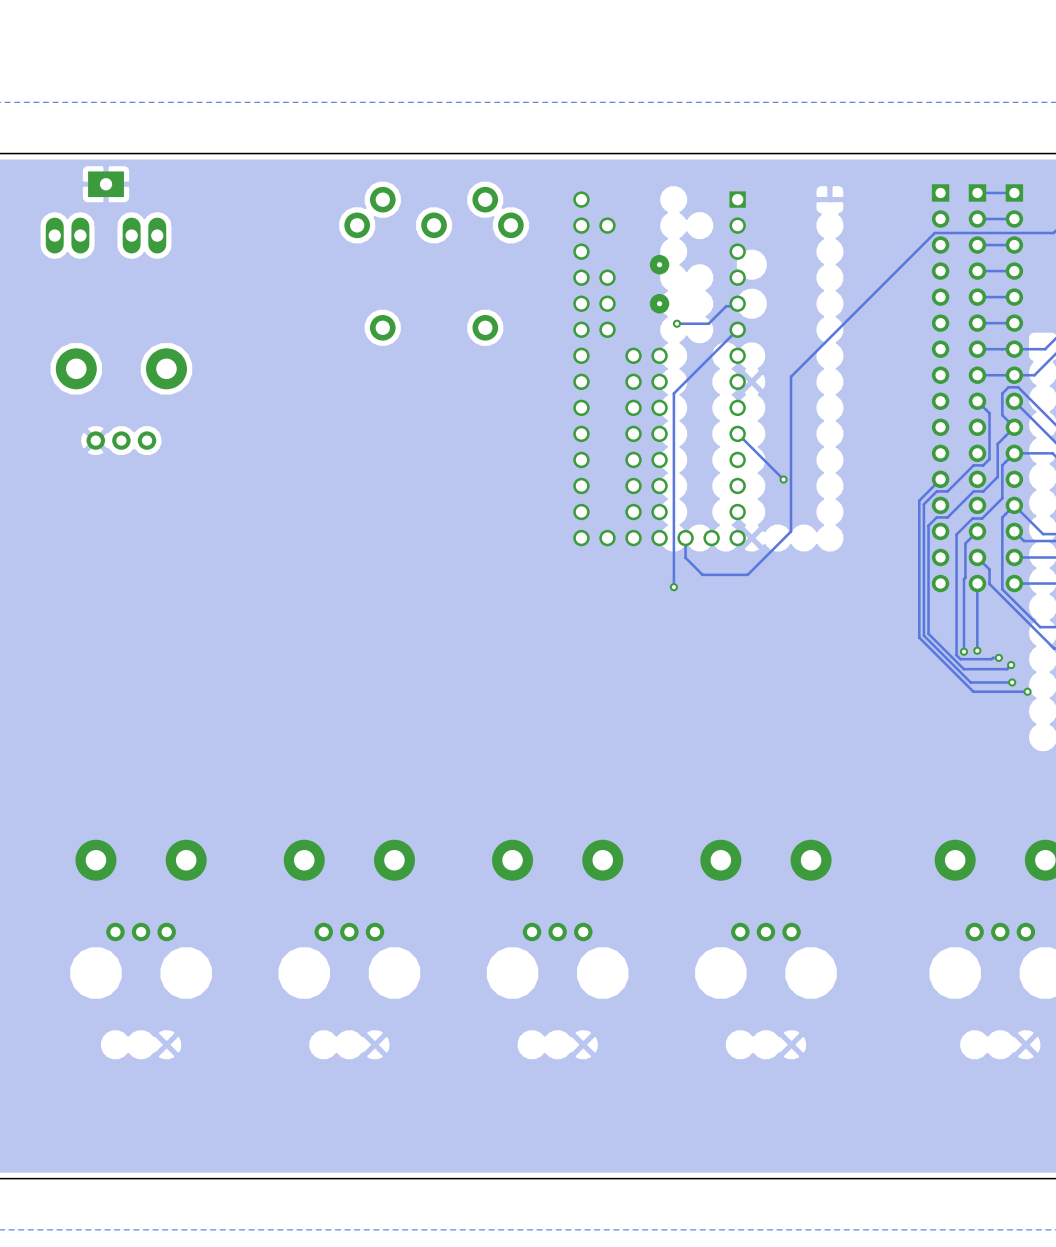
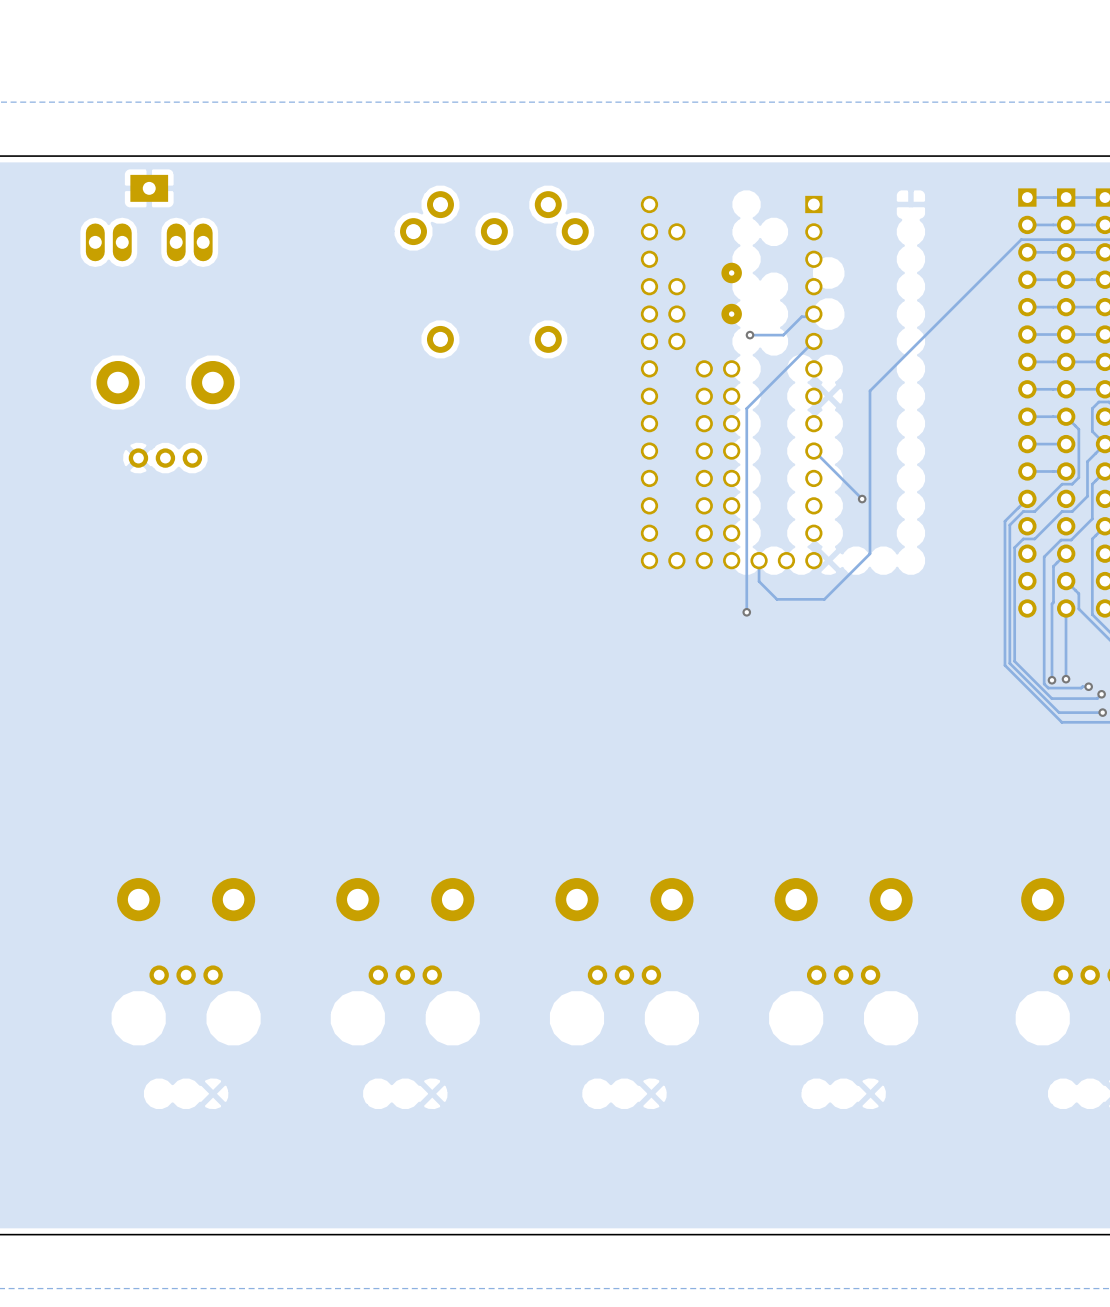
track: none -> (1066, 197) (1027, 197)
track: none -> (1066, 224) (1027, 224)
track: none -> (1066, 252) (1027, 252)
track: none -> (1066, 279) (1027, 279)
track: none -> (1066, 307) (1027, 307)
track: none -> (1066, 334) (1027, 334)
track: none -> (1066, 361) (1027, 361)
track: none -> (1066, 389) (1027, 389)
track: none -> (1066, 416) (1027, 416)
track: none -> (1066, 444) (1027, 444)
track: none -> (1066, 471) (1027, 471)

